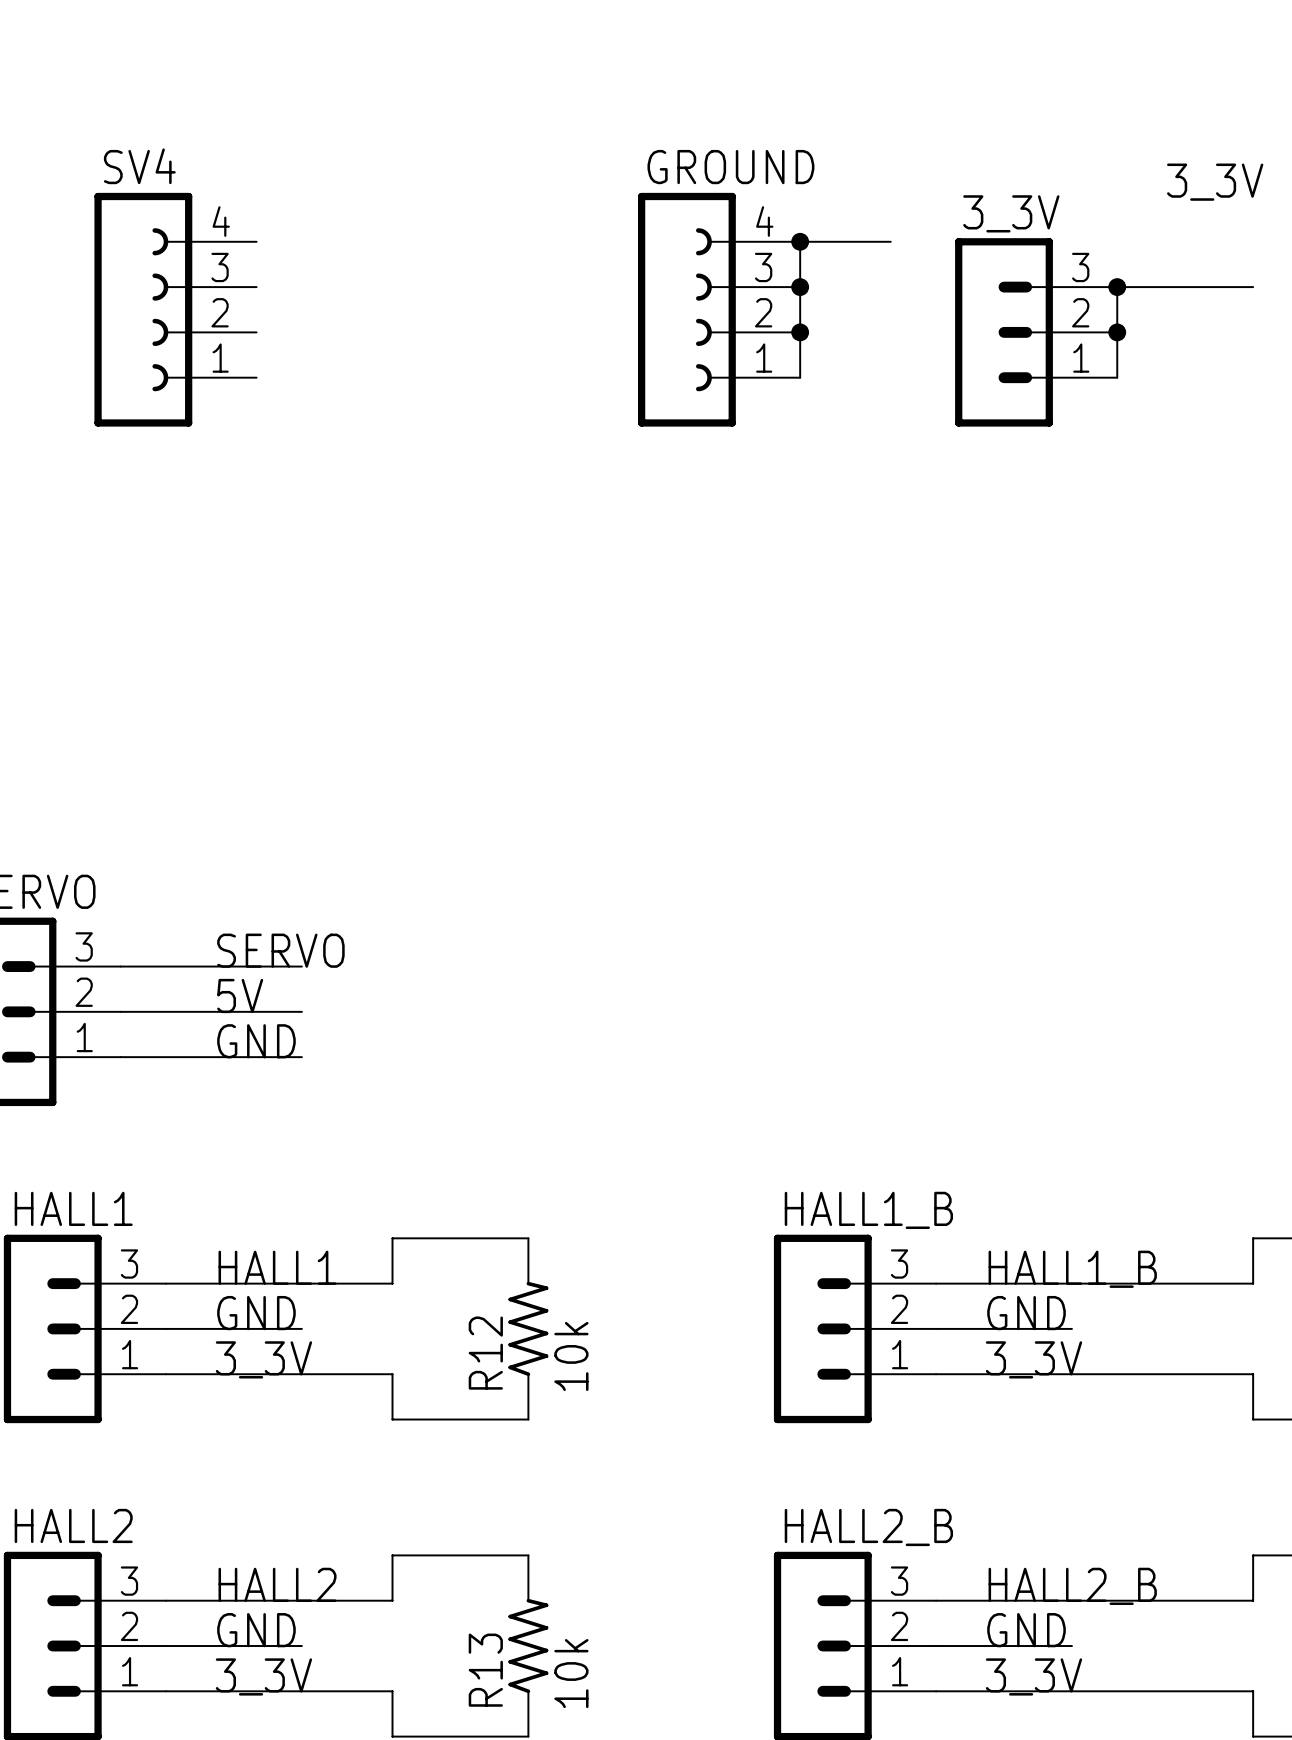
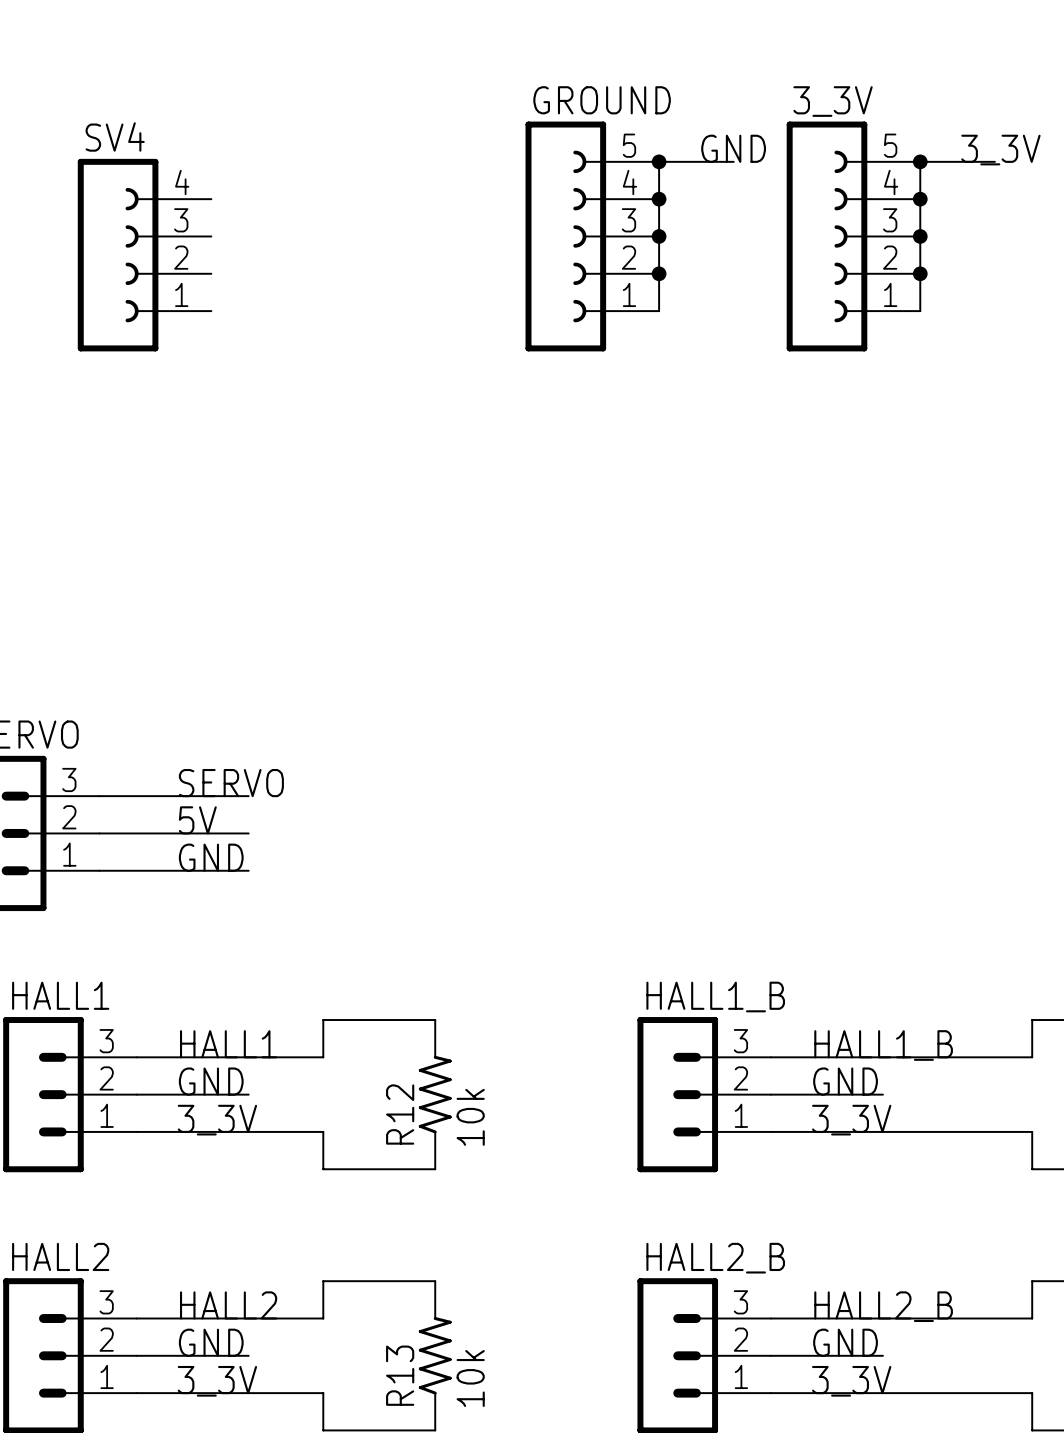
label: none -> GND (733, 148)
junction: none -> (659, 161)
junction: none -> (920, 161)
3_3V name position: 3_3V (1011, 213) -> 3_3V (833, 101)
3_3V symbol: [955, 238, 1118, 427] -> [786, 121, 921, 352]
wire: (800, 241) (890, 241) -> (659, 199) (659, 161) (733, 161)
junction: none -> (920, 199)
GROUND: none -> (592, 236)
wire: (1117, 287) (1253, 287) -> (920, 236) (920, 161) (994, 161)
GROUND: (719, 309) -> none

